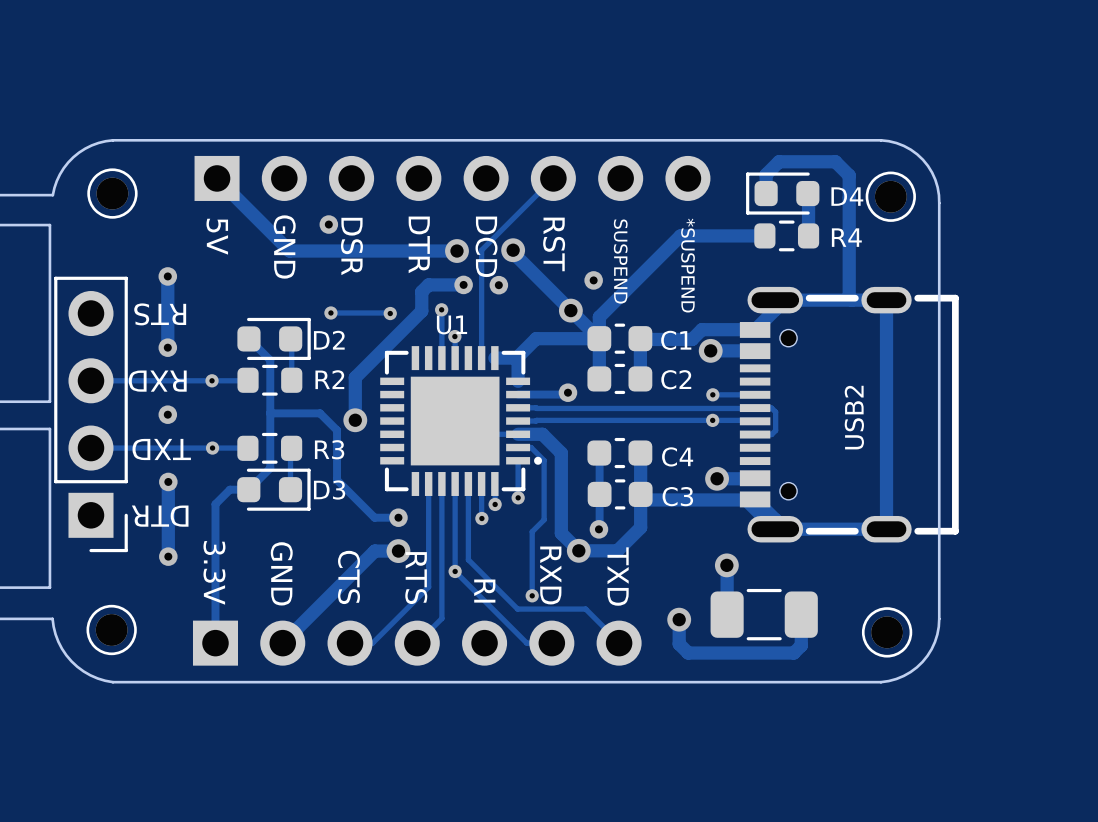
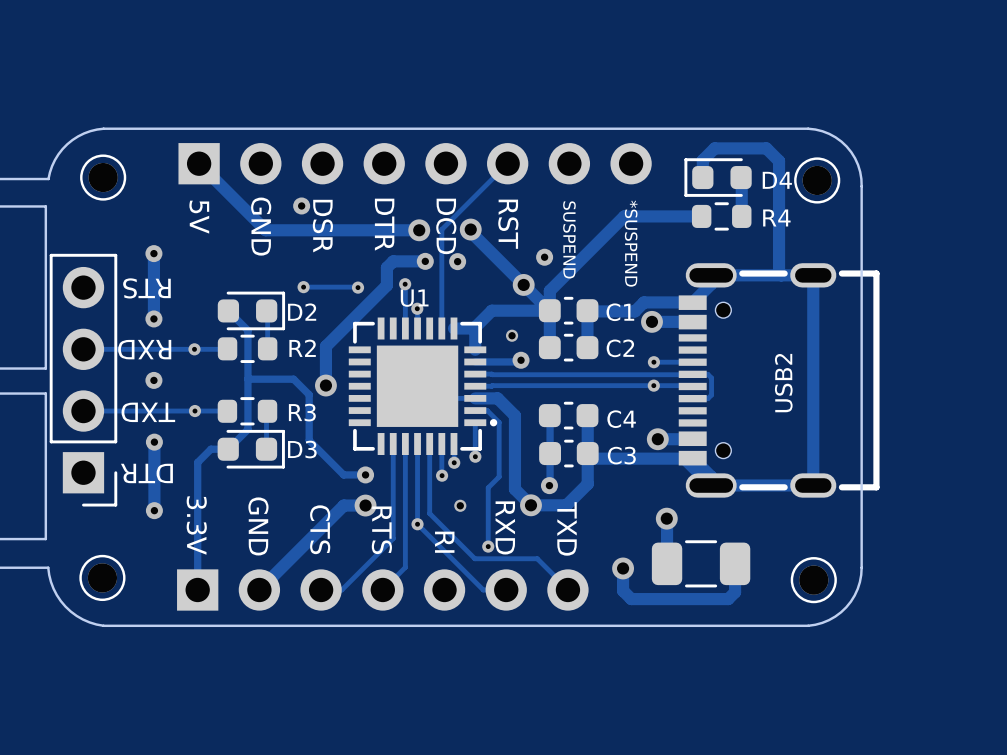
via: none -> (512, 335)
via: none -> (460, 505)

